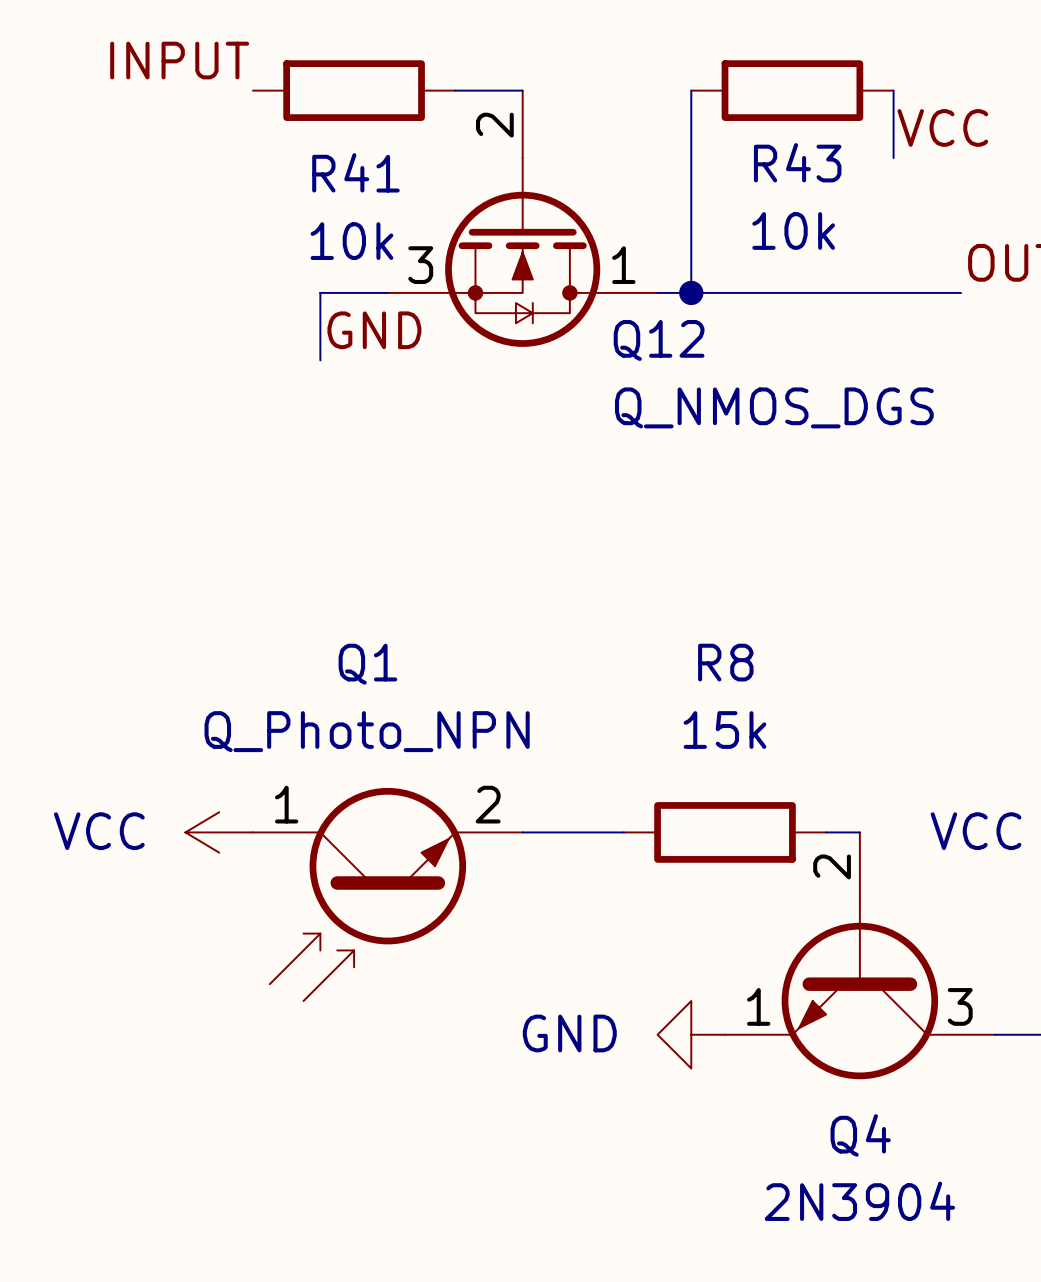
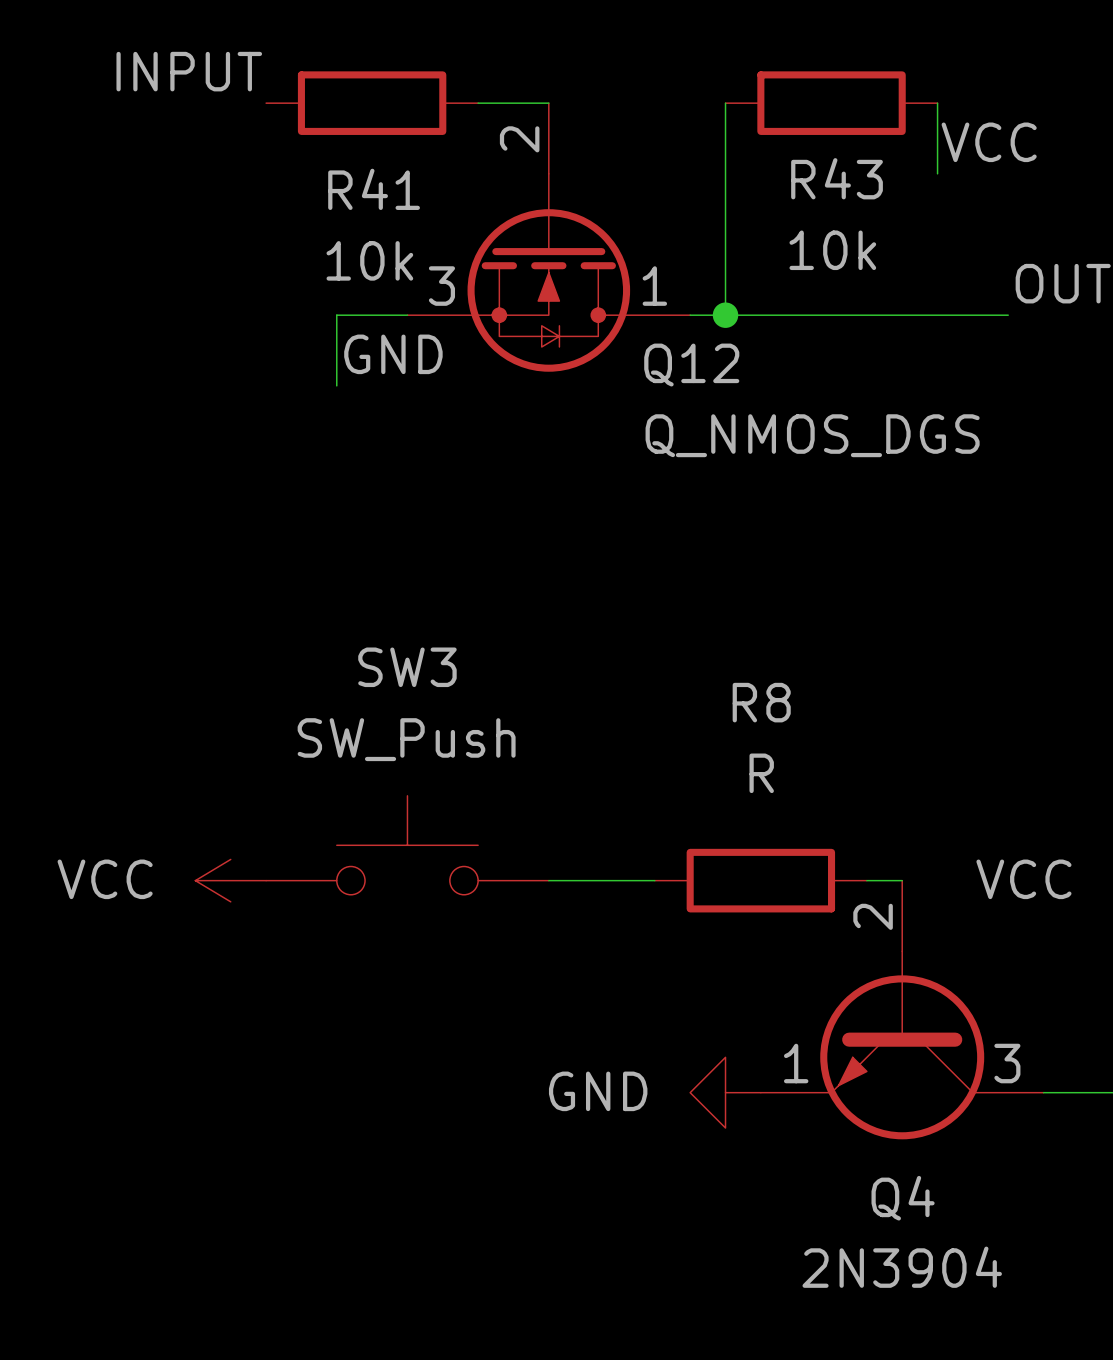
R8 value: 15k (724, 730) -> R (761, 773)
SW3: none -> SW_Push (407, 845)
Q1: Q_Photo_NPN (387, 894) -> none

